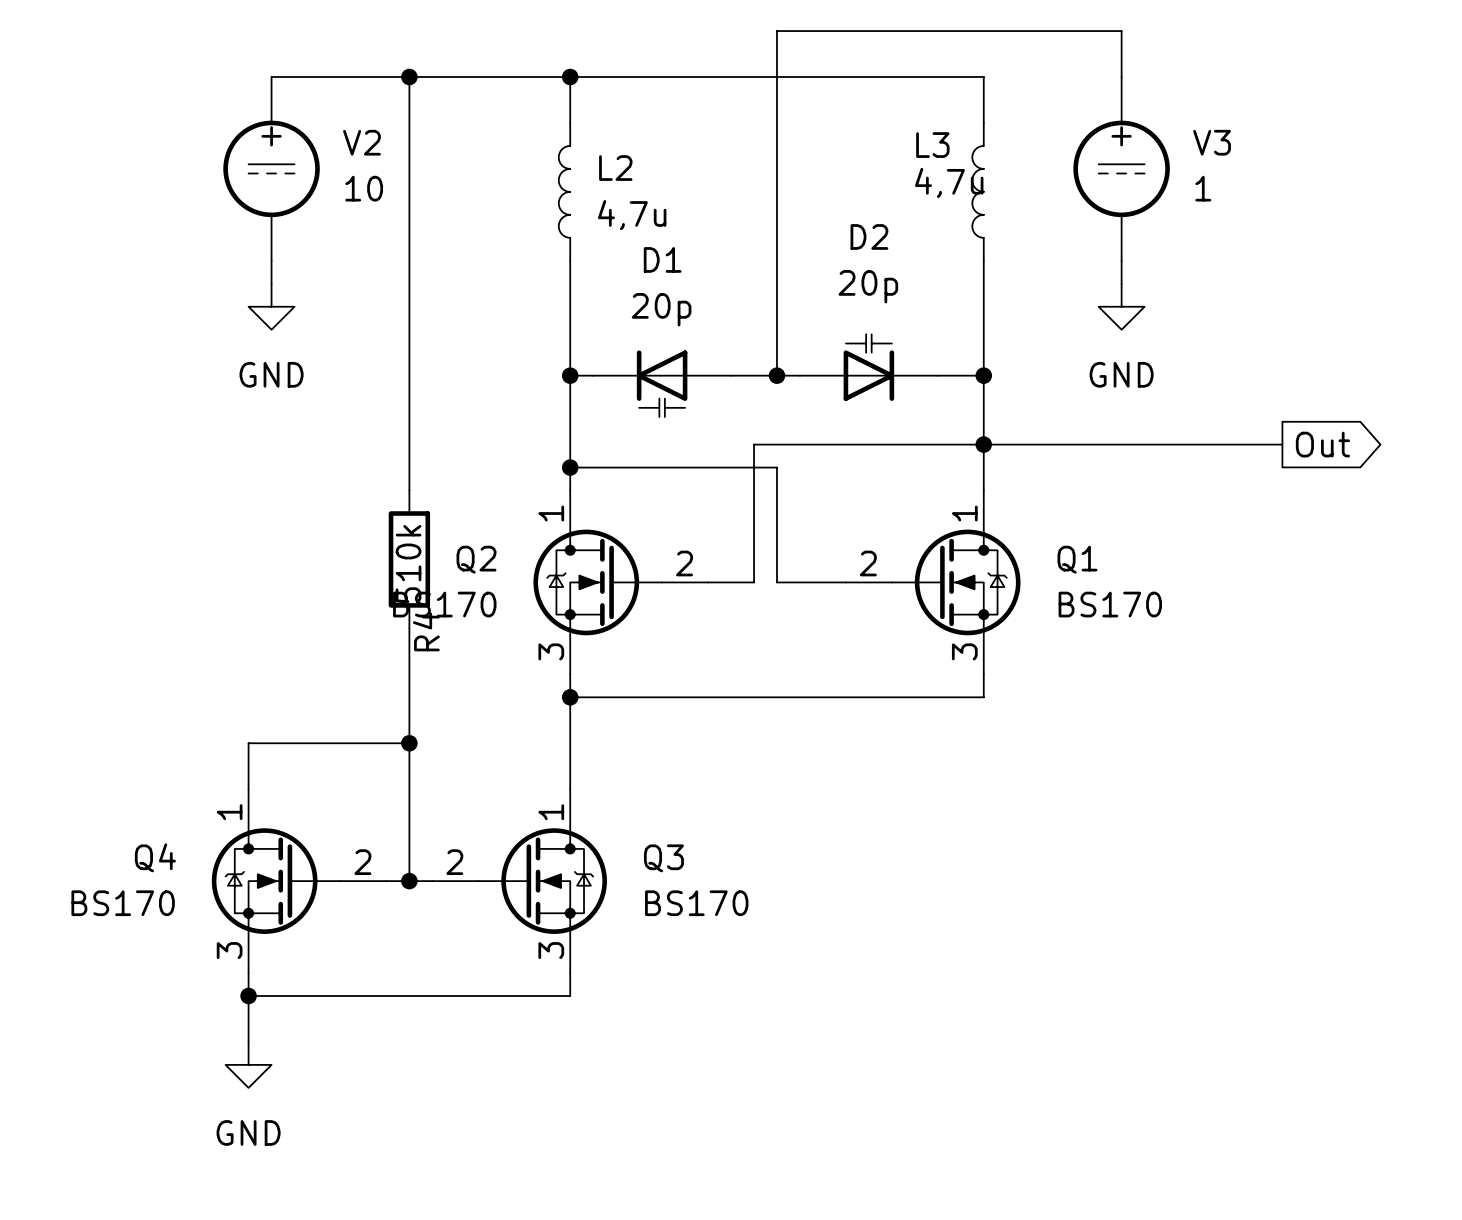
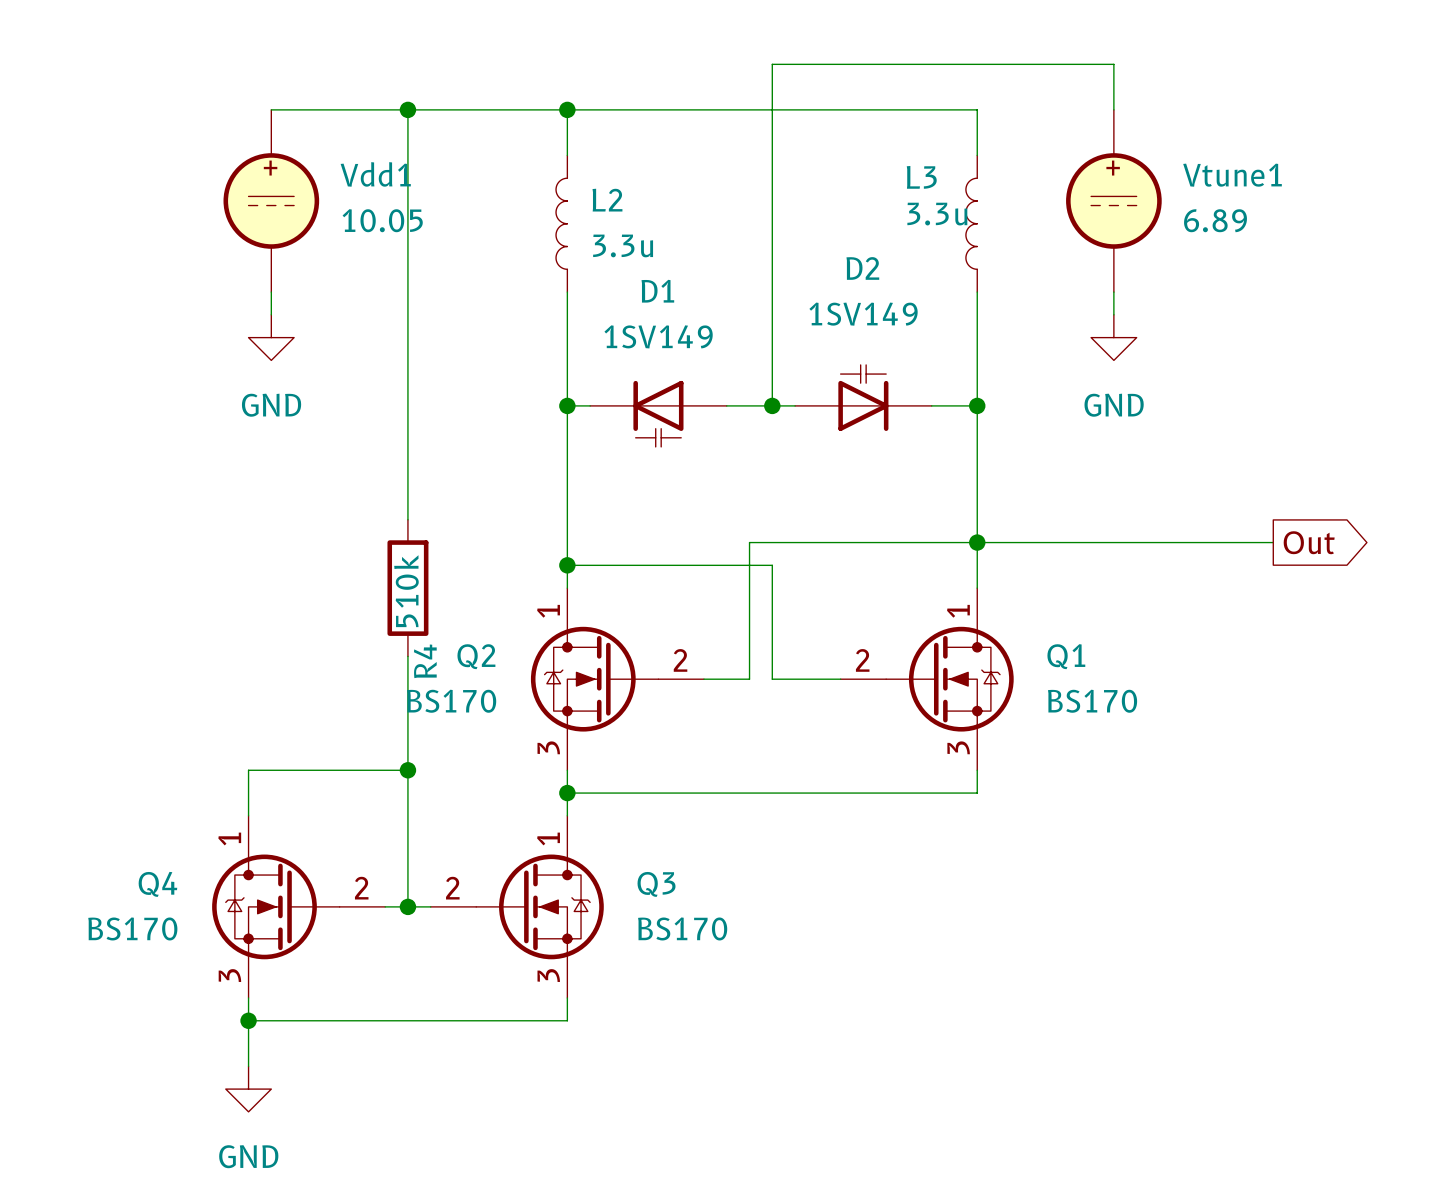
V2 name: V2 (361, 142) -> Vdd1 (375, 174)
V3 name: V3 (1212, 142) -> Vtune1 (1232, 175)
L3 value: 4,7u (949, 182) -> 3.3u (937, 214)
V2 value: 10 (364, 188) -> 10.05 (382, 220)
V3 value: 1 (1203, 188) -> 6.89 (1215, 220)
L2 value: 4,7u (632, 215) -> 3.3u (623, 245)
D2 value: 20p (868, 286) -> 1SV149 (863, 314)
D1 value: 20p (661, 309) -> 1SV149 (658, 336)
junction position: (983, 444) -> (977, 542)
wire: (1282, 444) (754, 444) (754, 513) -> (1273, 542) (749, 542)
global label position: Out (1322, 444) -> Out (1309, 542)
wire: (570, 467) (776, 467) (776, 536) -> (567, 565) (772, 565)
junction position: (570, 467) -> (567, 565)
Q2 position: (620, 582) -> (617, 679)
wire: (708, 582) (754, 582) -> (703, 679) (749, 679) (749, 610)
wire: (776, 582) (845, 582) -> (772, 610) (772, 679) (840, 679)
Q1 position: (933, 582) -> (927, 679)
wire: (983, 674) (983, 697) (570, 697) -> (977, 770) (977, 793) (567, 793)
junction position: (570, 697) -> (567, 793)

